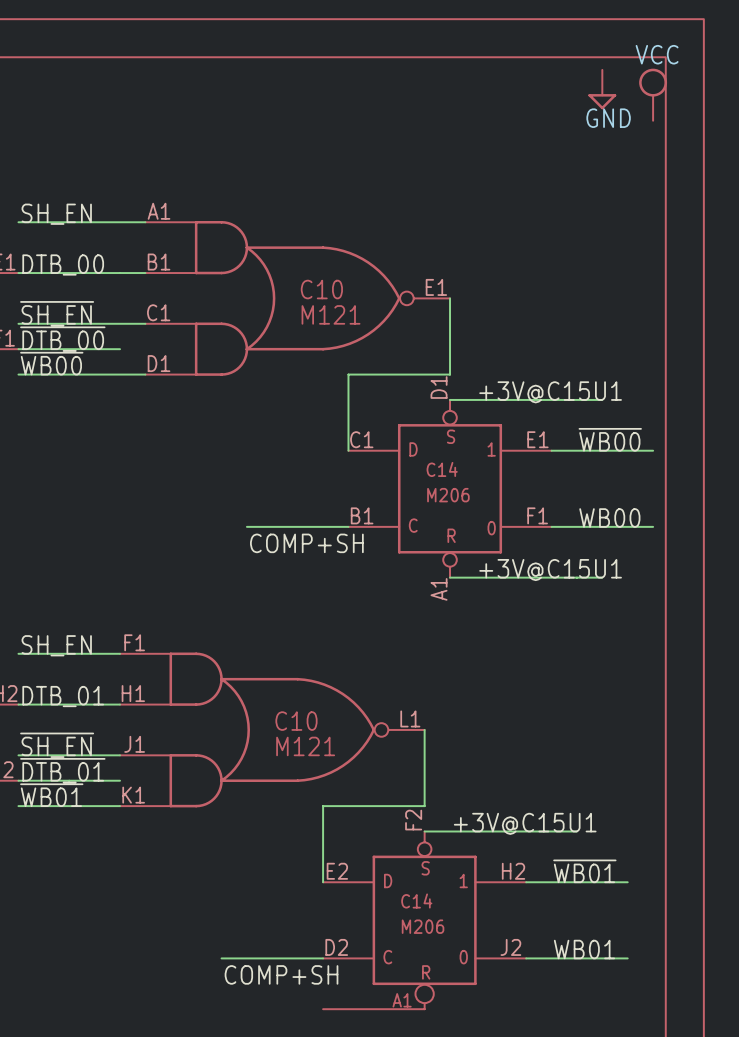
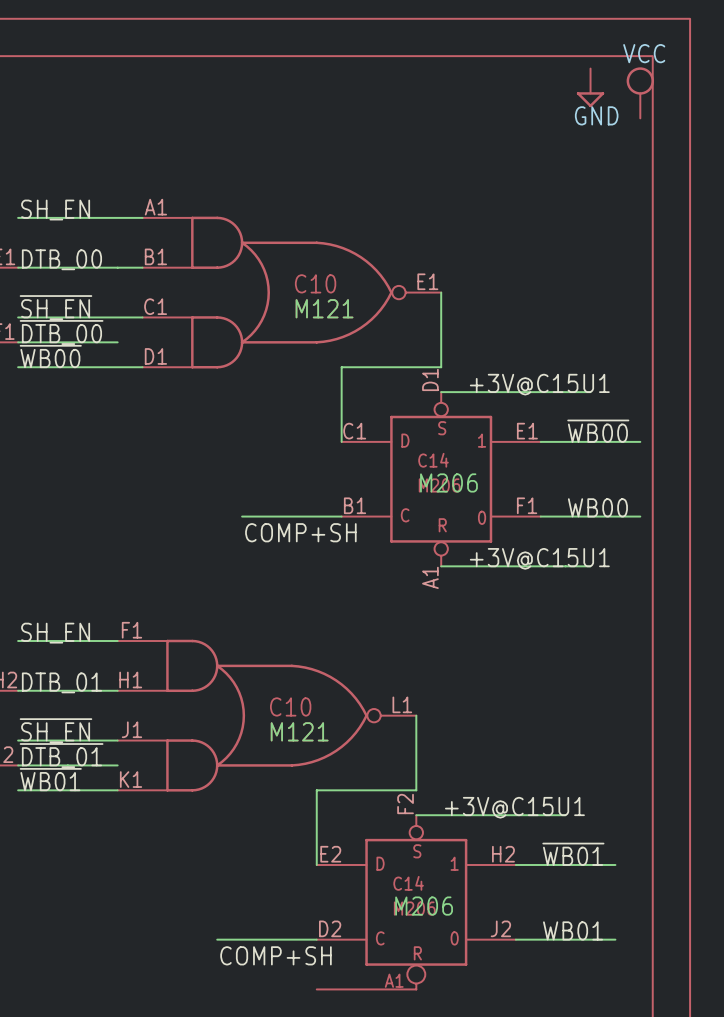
text: none -> M121 (324, 308)
text: none -> M206 (448, 482)
text: none -> M121 (299, 731)
text: none -> M206 (424, 906)

